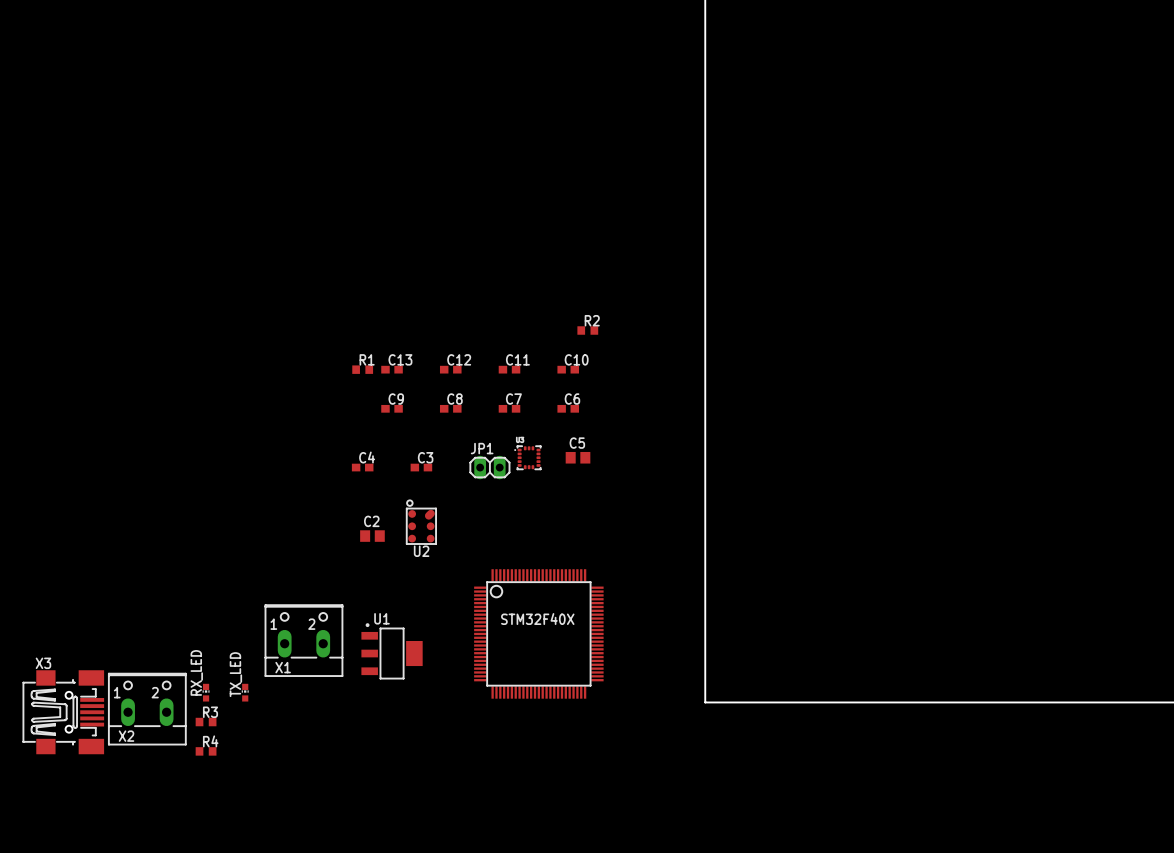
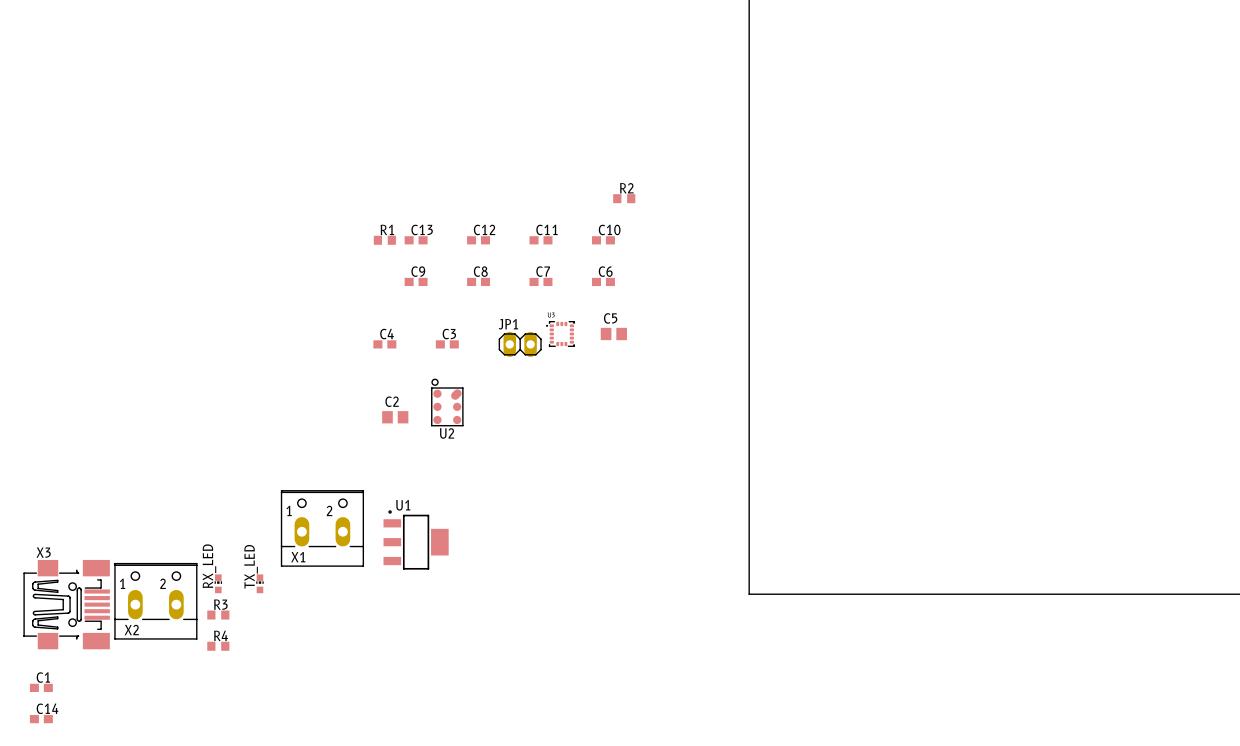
part: (538, 633) -> none
C1: none -> (41, 687)
C14: none -> (41, 719)

